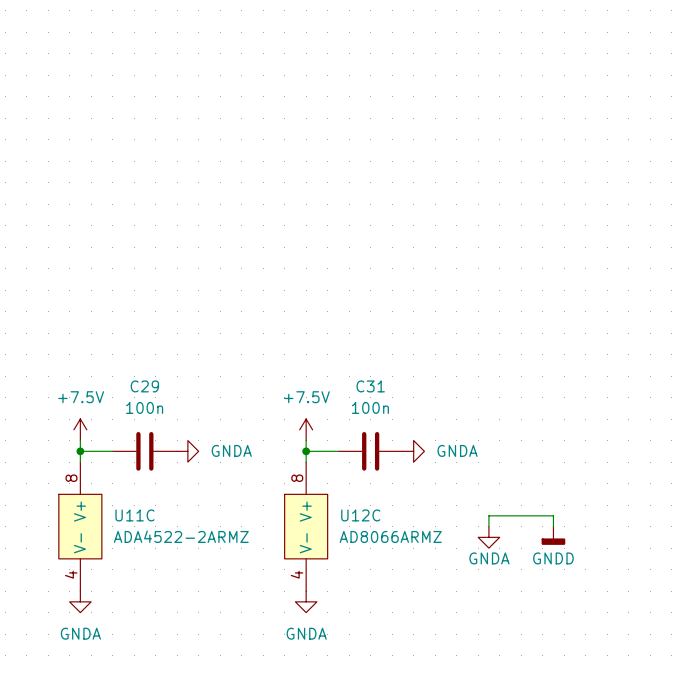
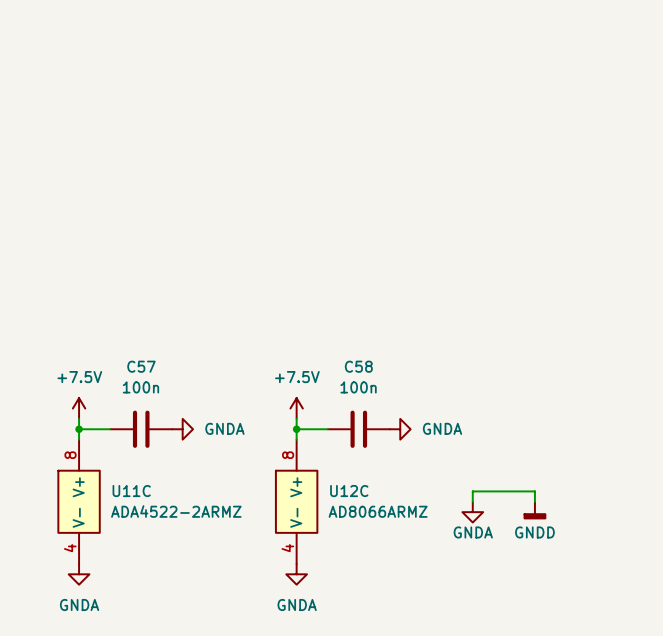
C29 name: C29 (144, 386) -> C57 (141, 366)
C31 name: C31 (370, 386) -> C58 (358, 366)

